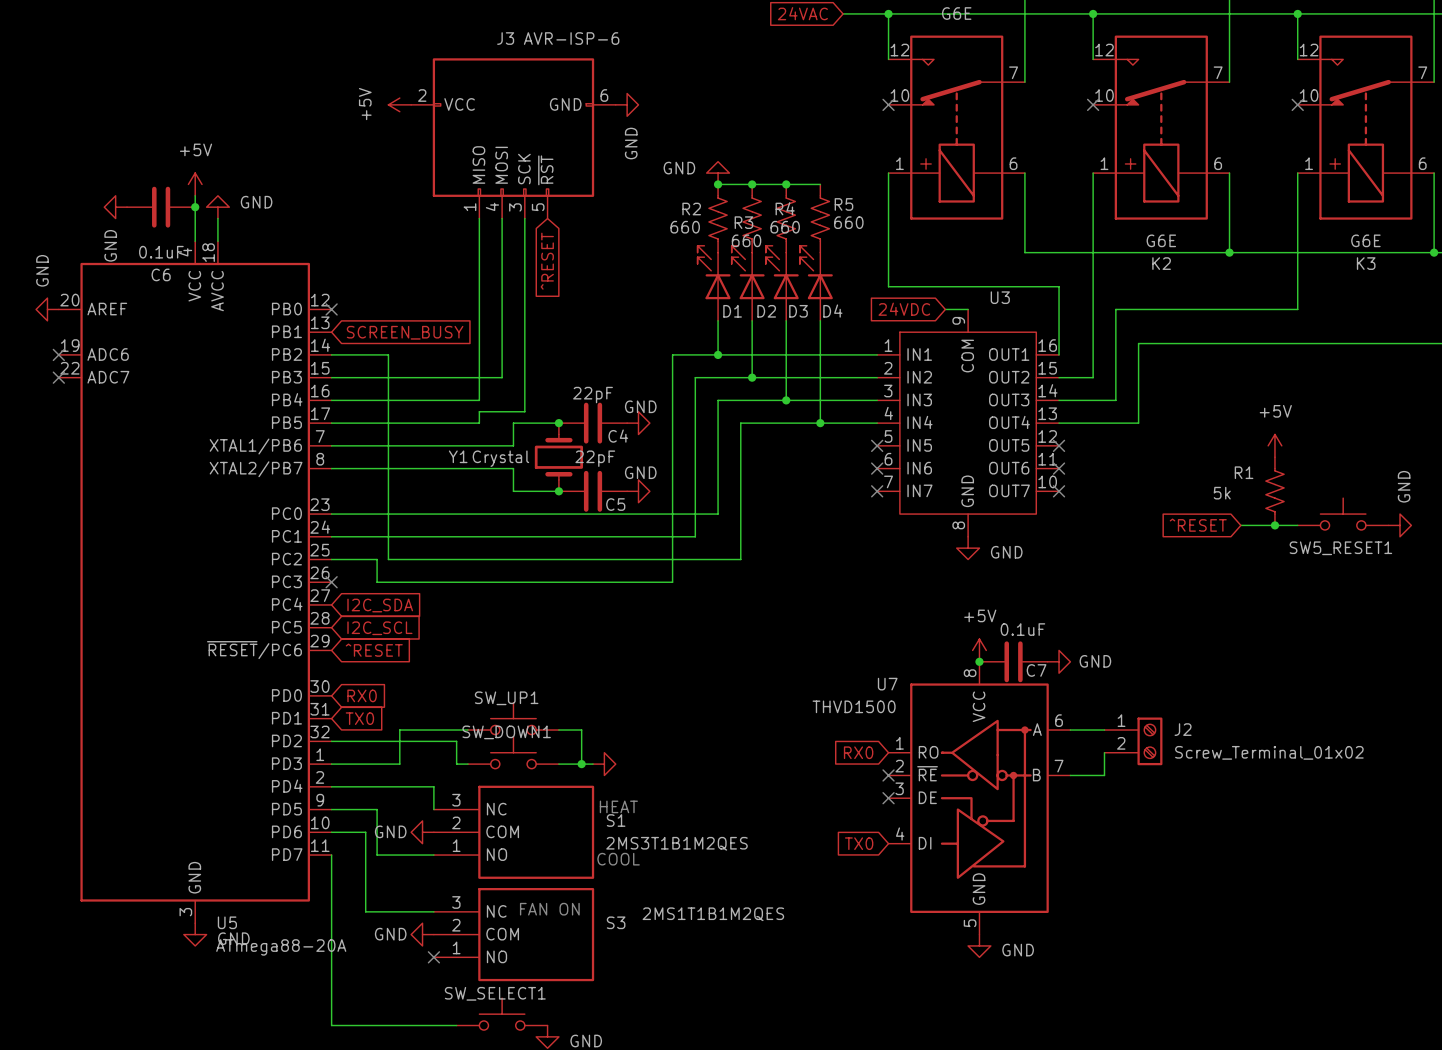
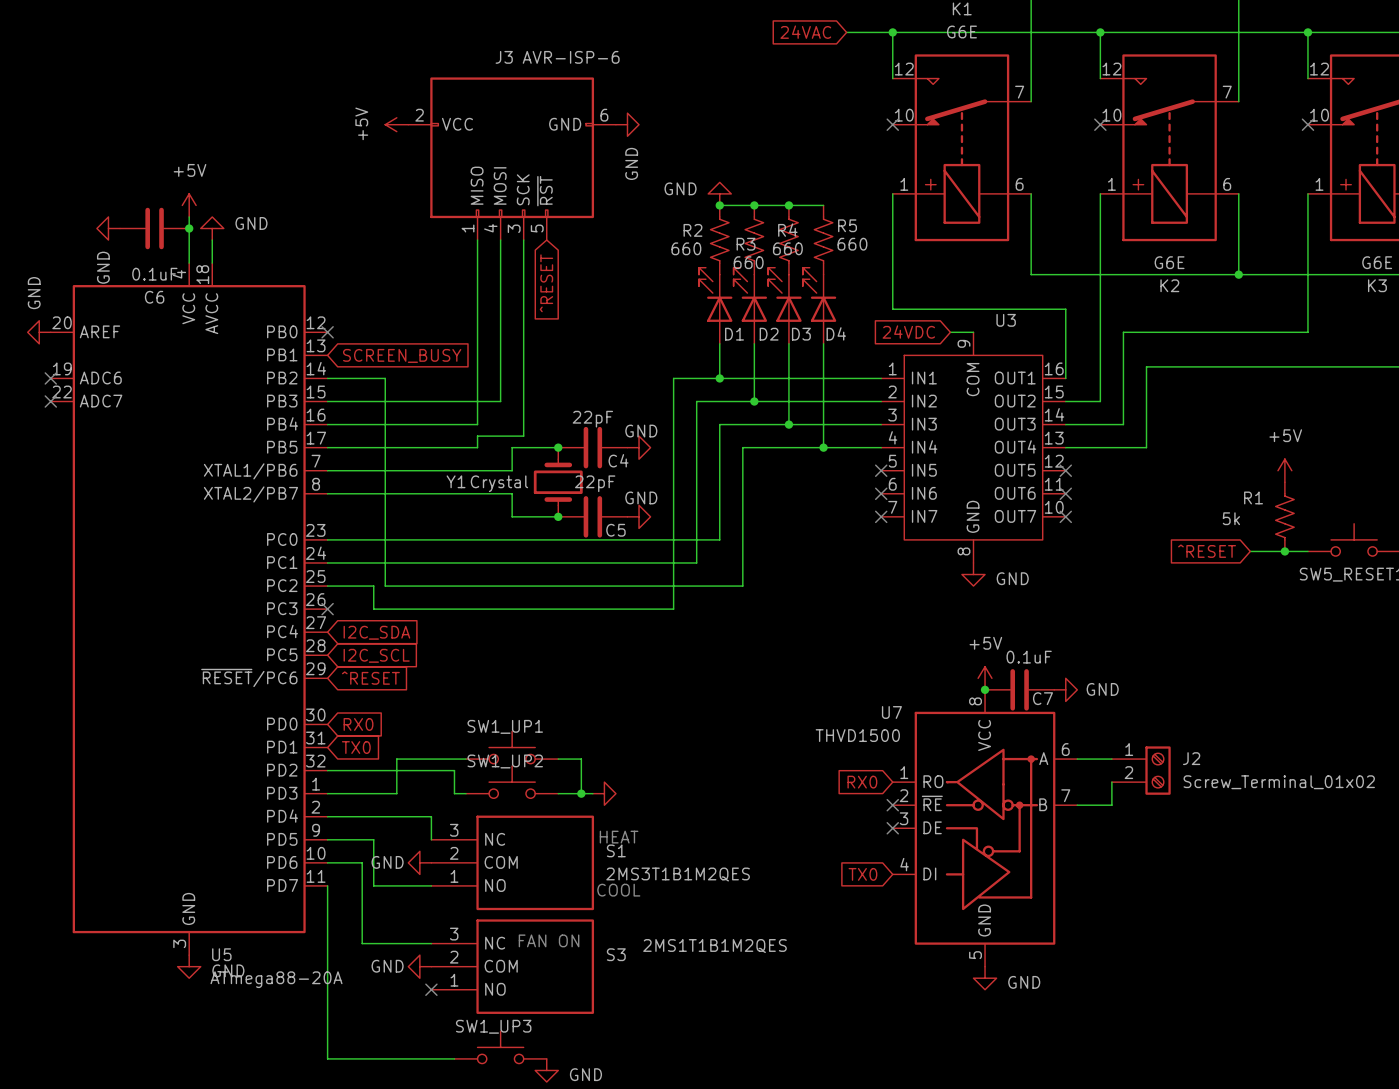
SW_UP1 name: SW_UP1 (506, 698) -> SW1_UP1 (505, 726)
SW_DOWN1 name: SW_DOWN1 (506, 732) -> SW1_UP2 (505, 761)
SW_SELECT1 name: SW_SELECT1 (495, 993) -> SW1_UP3 (493, 1026)

